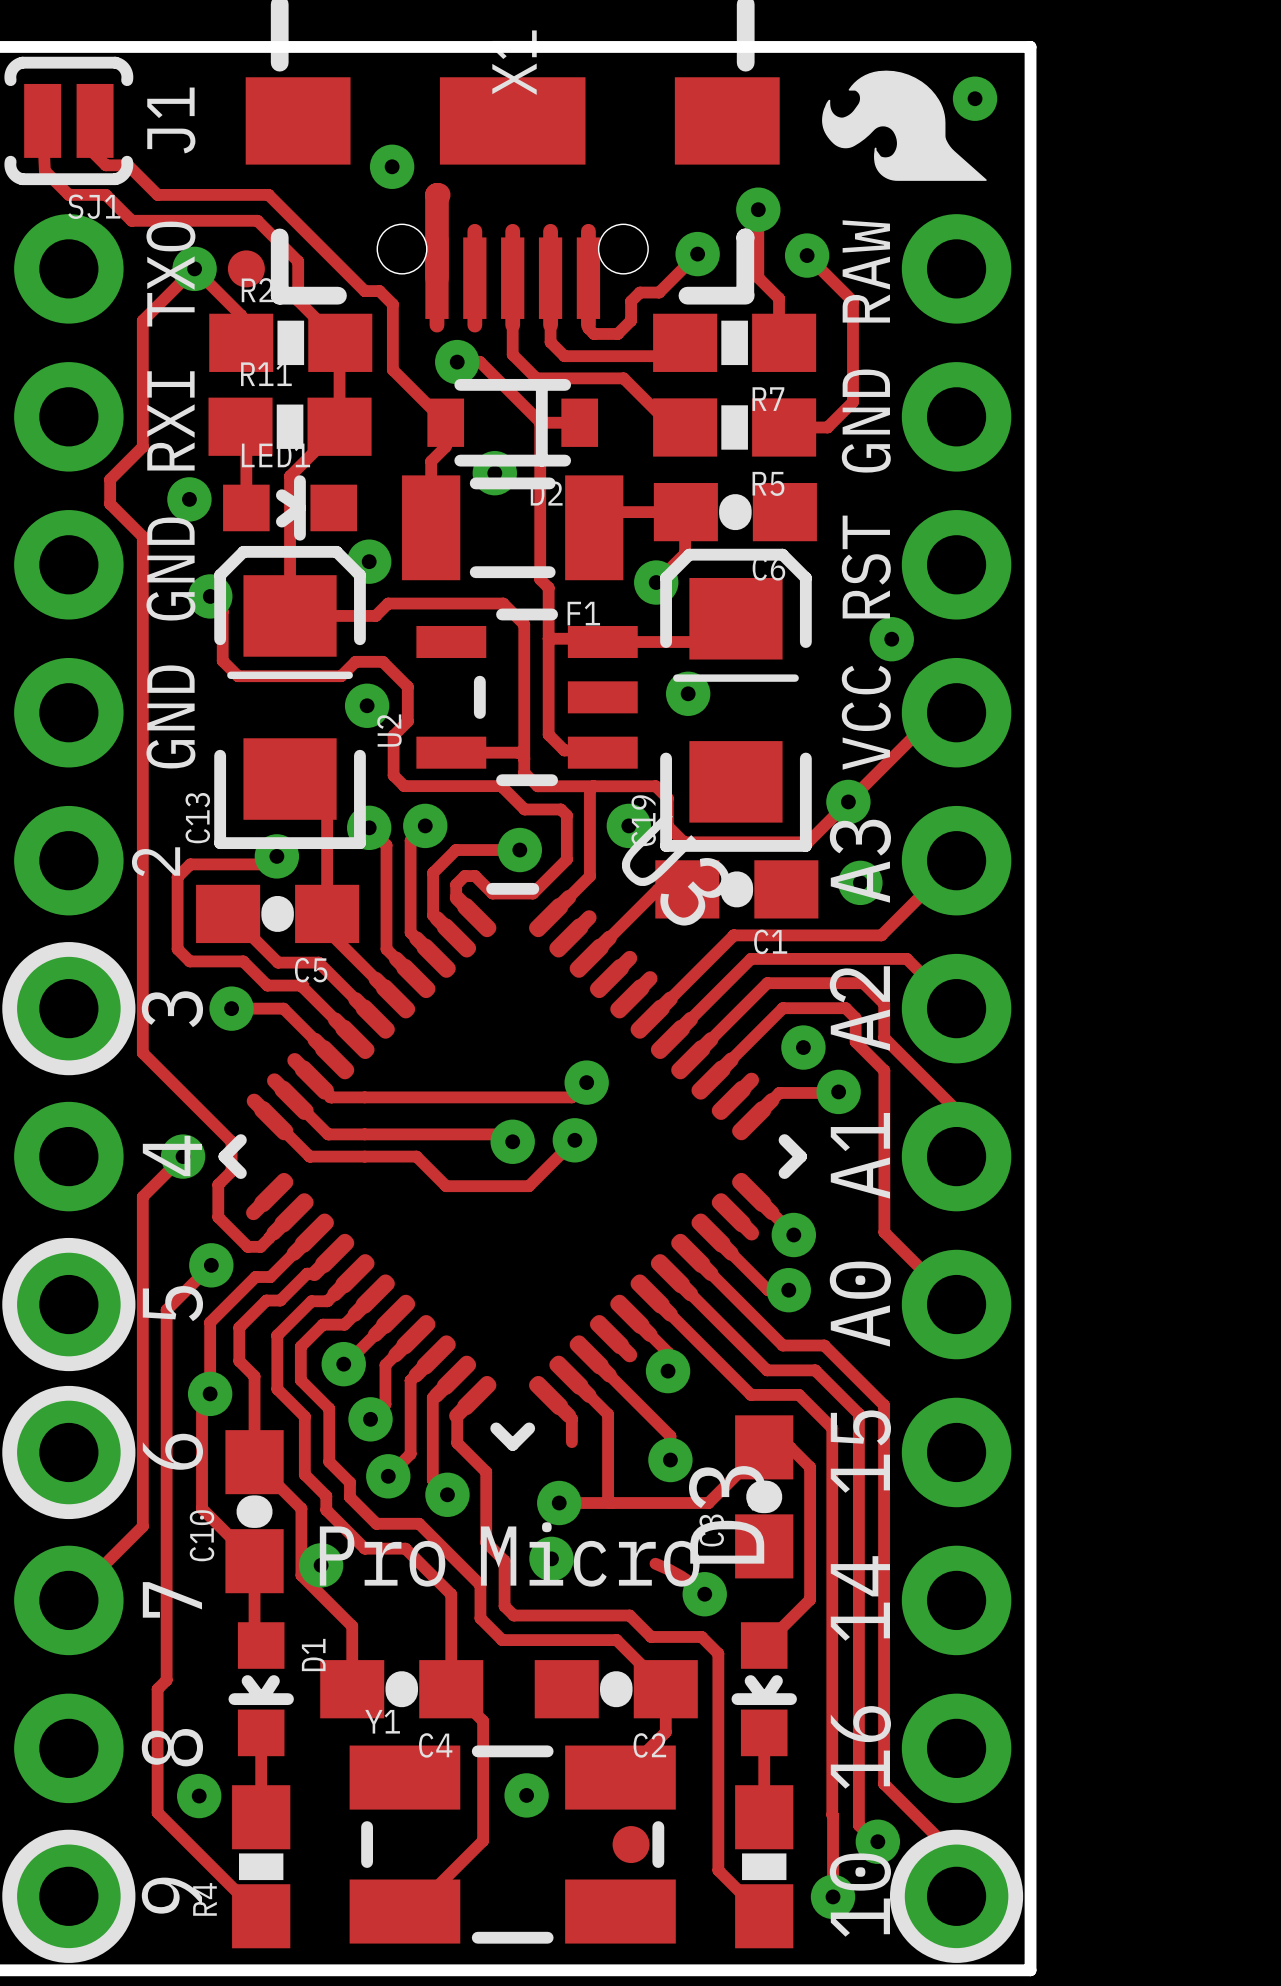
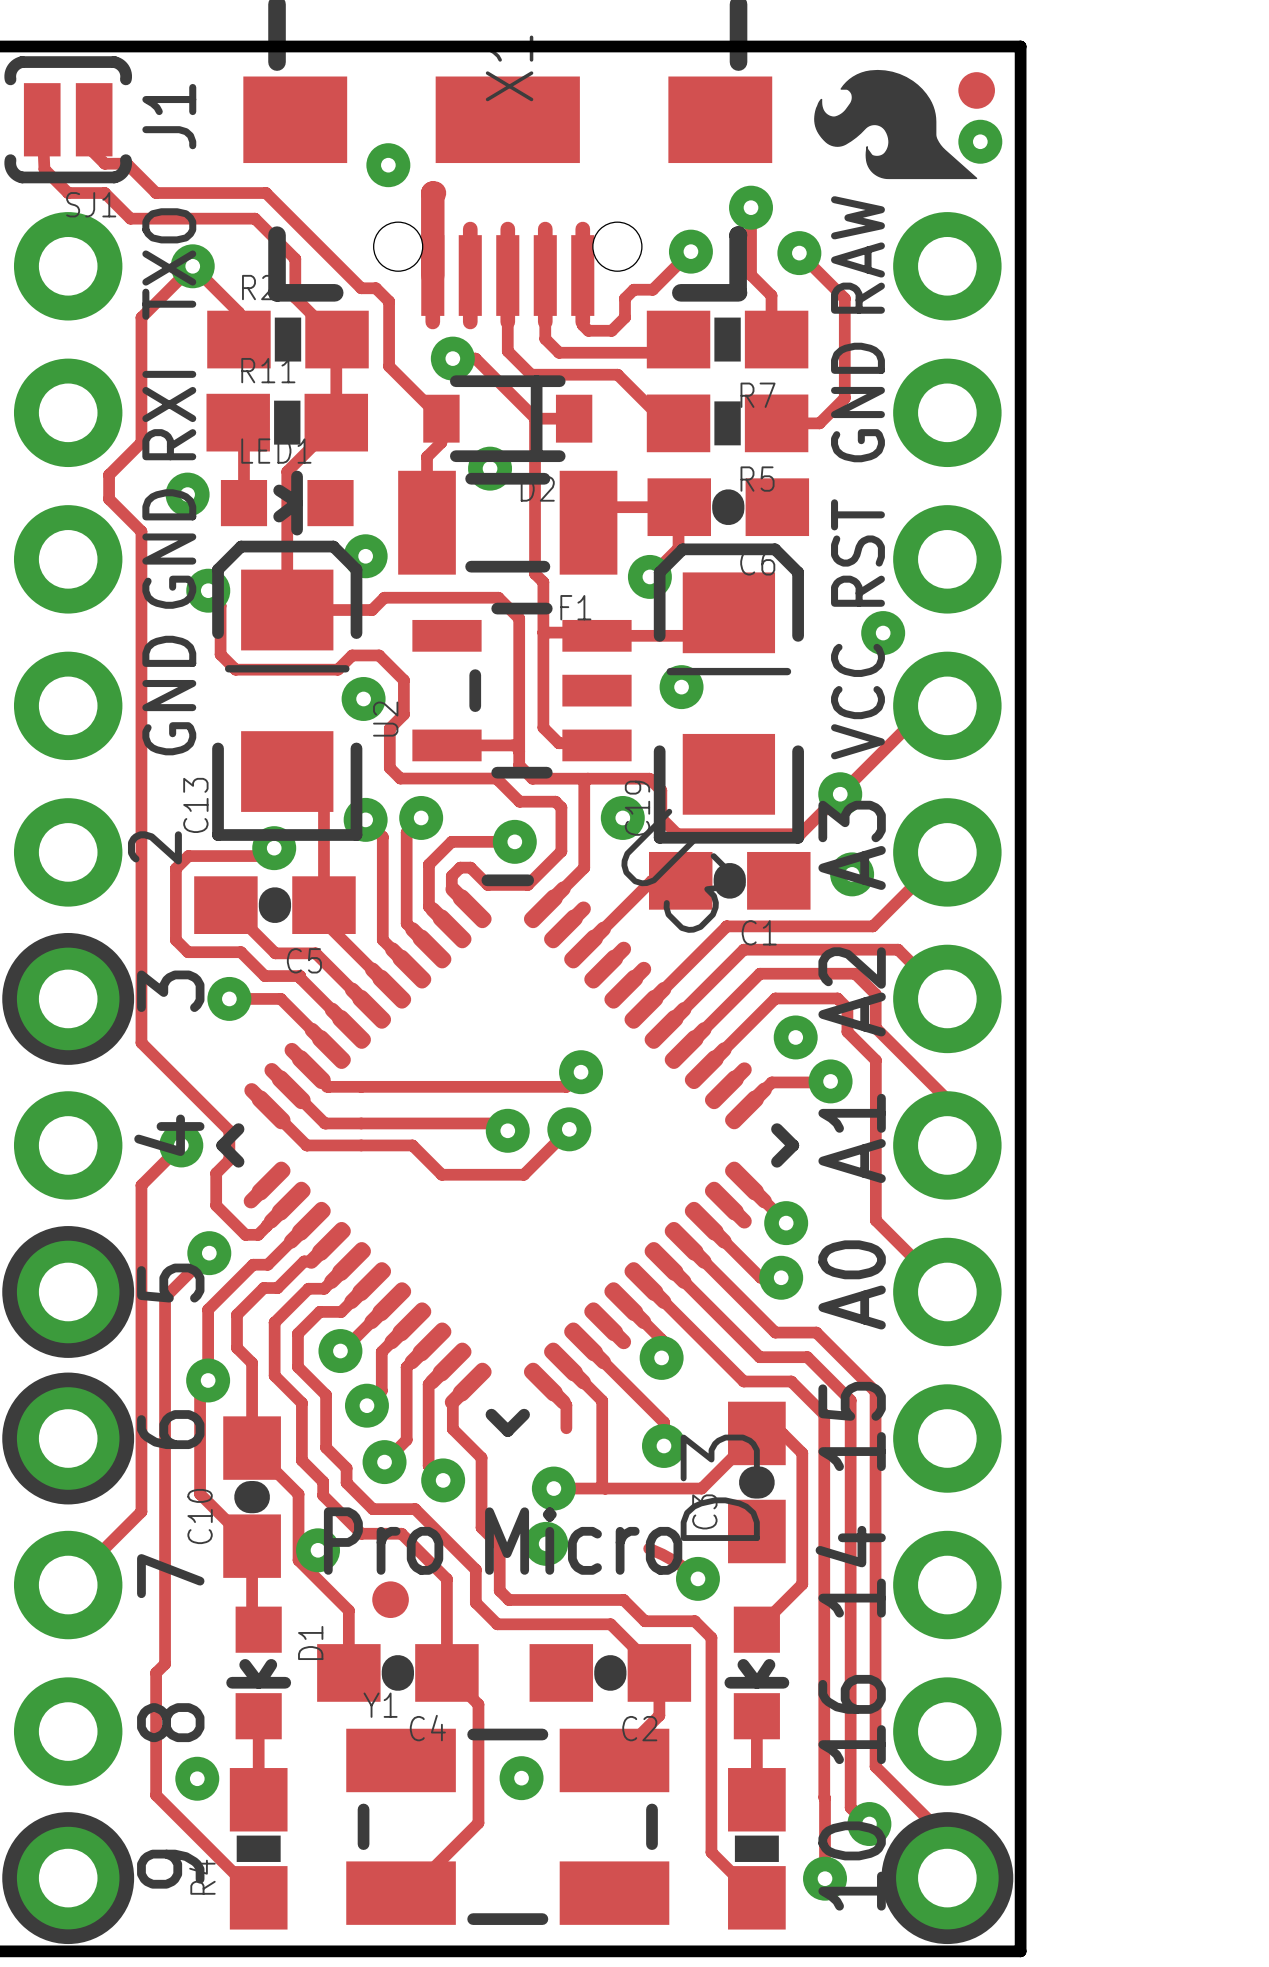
part: none -> (976, 90)
via position: (975, 98) -> (980, 141)
part: (246, 268) -> none
part position: (631, 1844) -> (390, 1599)

